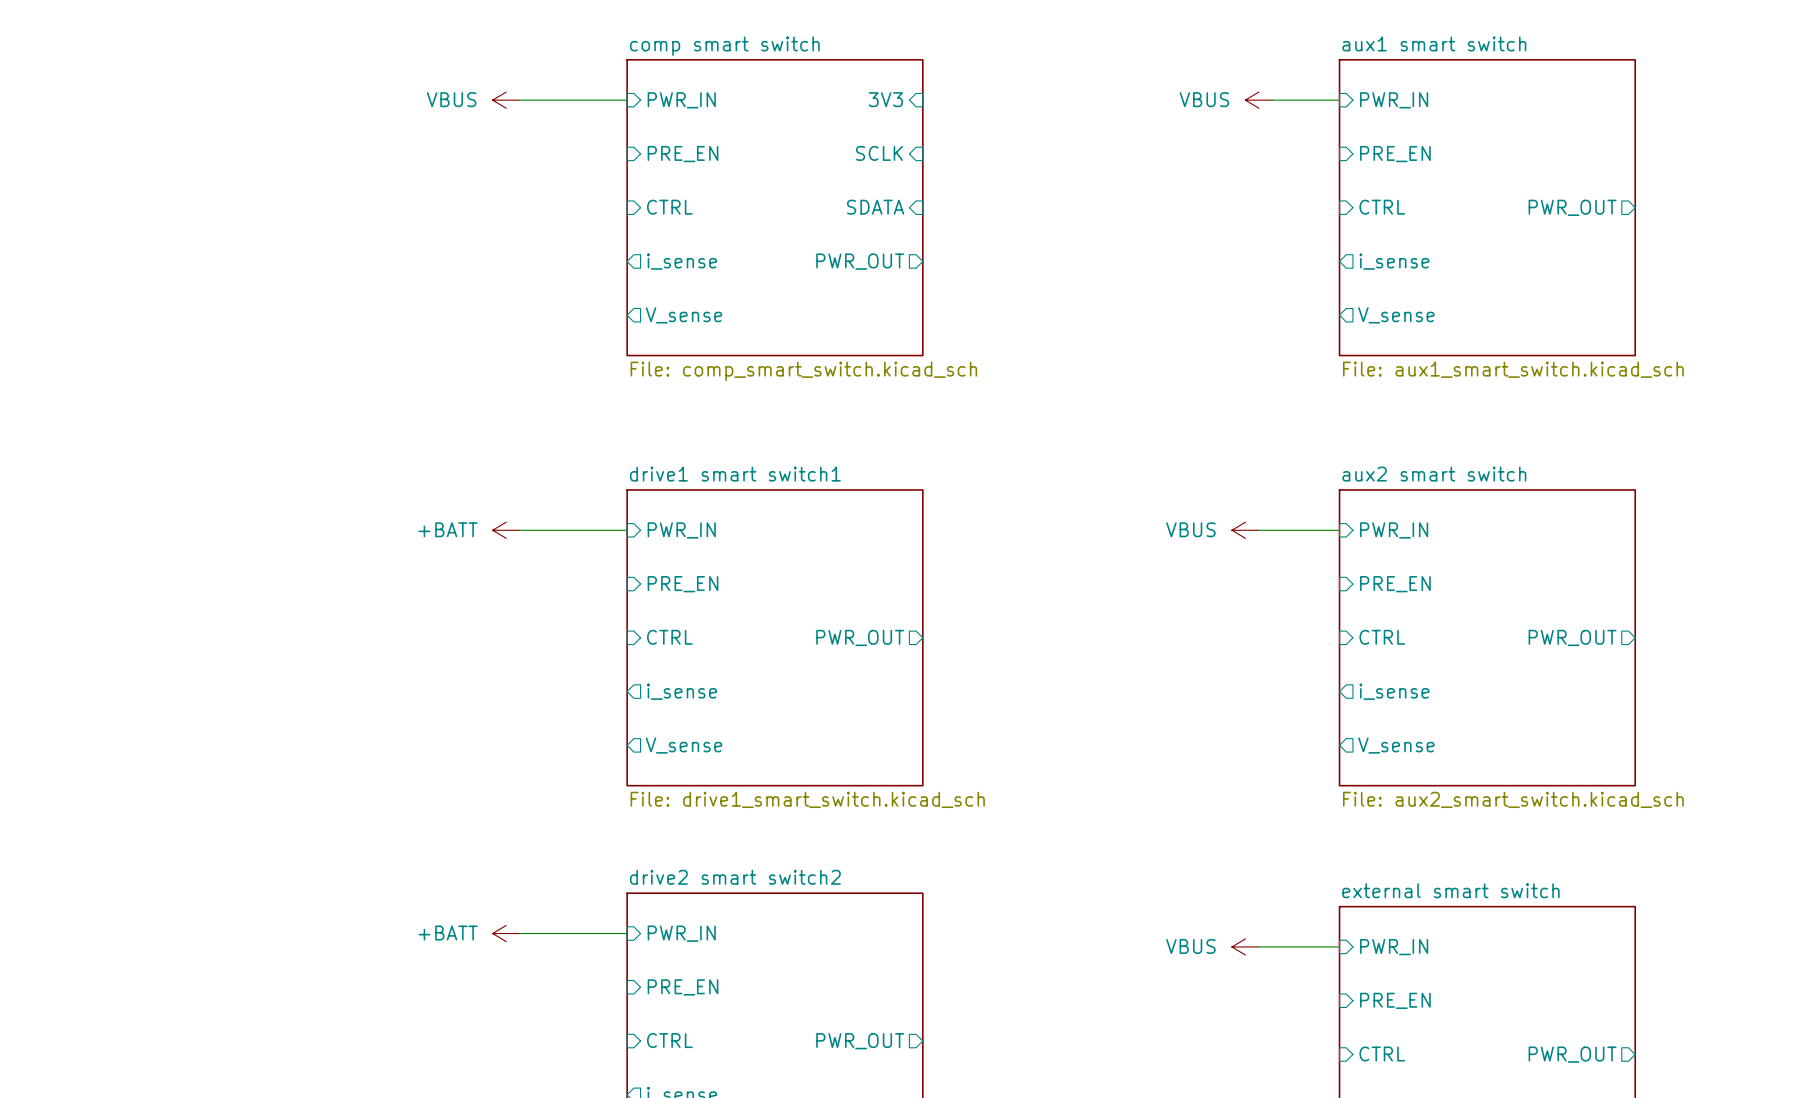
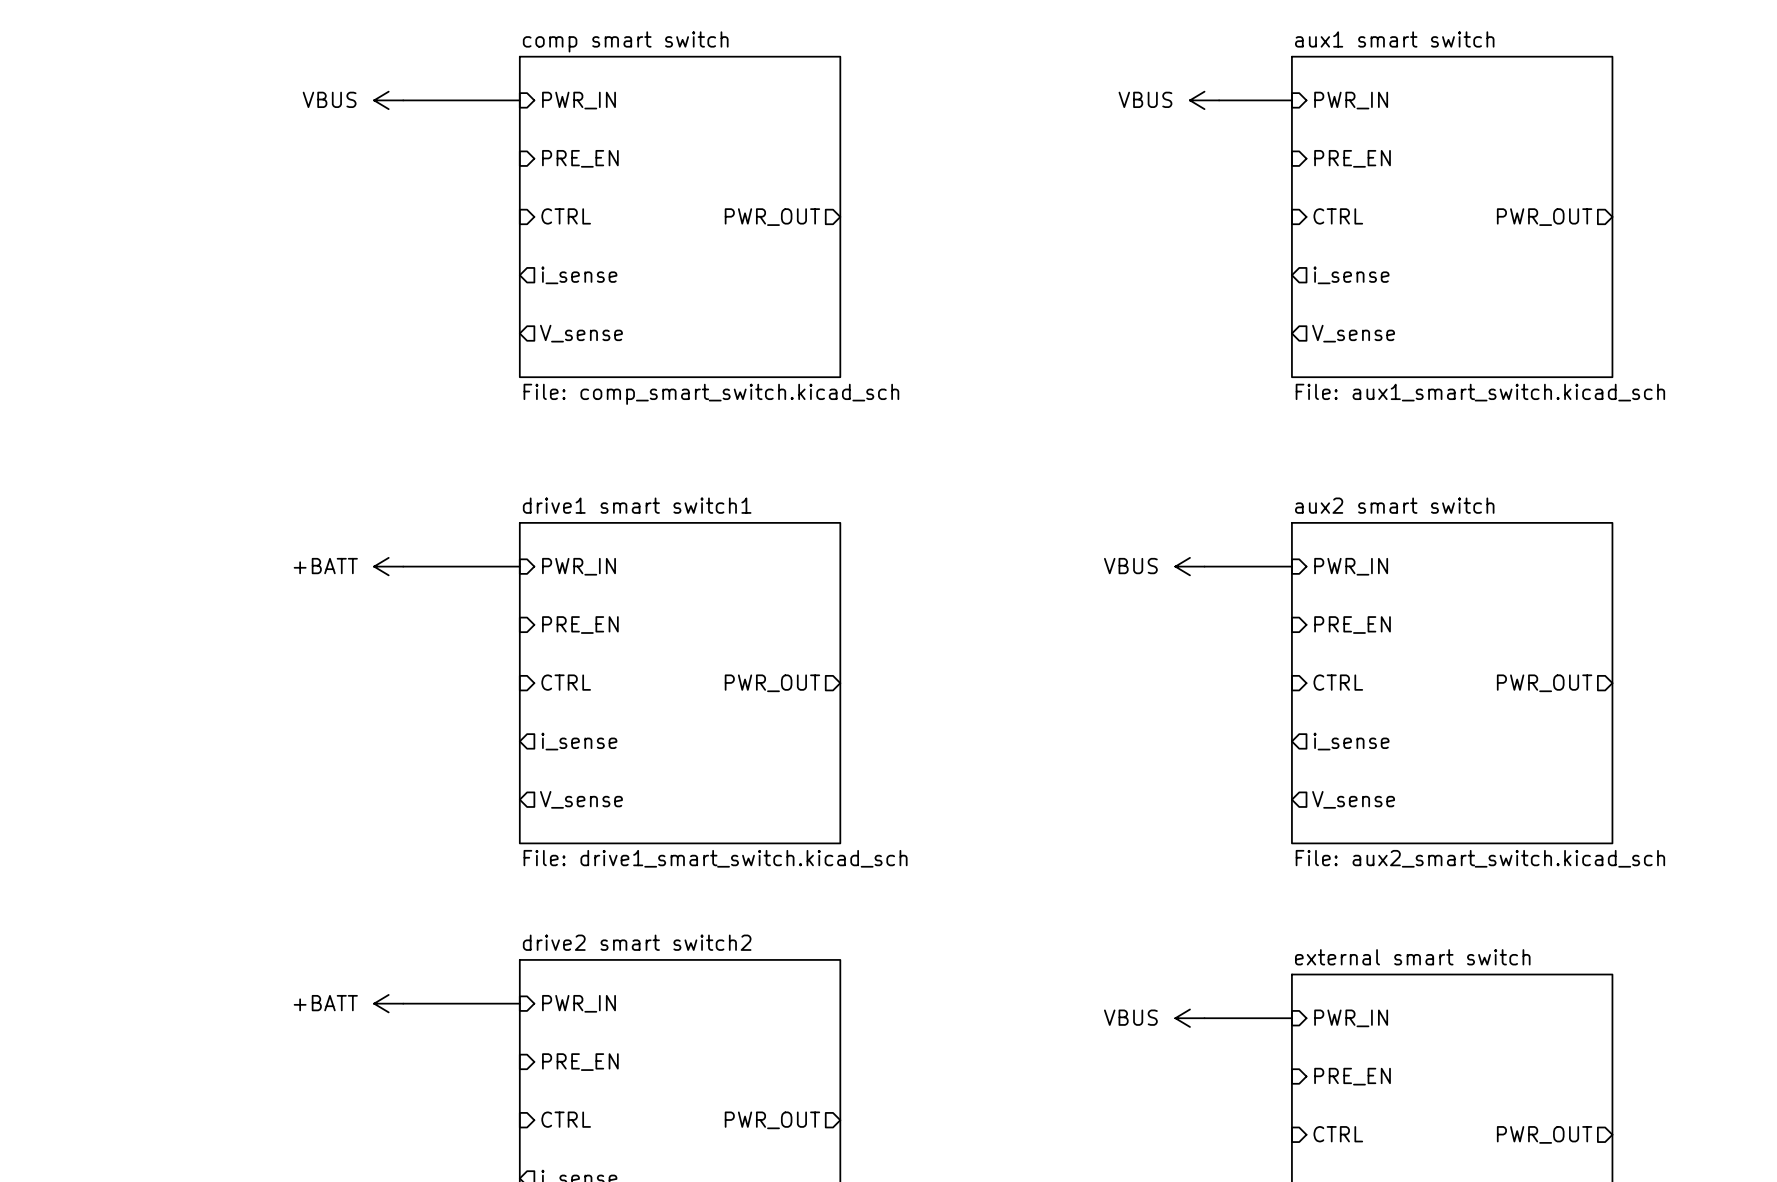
sheet pin: 3V3 (885, 99) -> none
sheet pin: SCLK (879, 153) -> none
sheet pin shape: input (875, 207) -> output (772, 217)
sheet pin: SDATA (875, 207) -> PWR_OUT (772, 217)
sheet pin: PWR_OUT (860, 261) -> none

